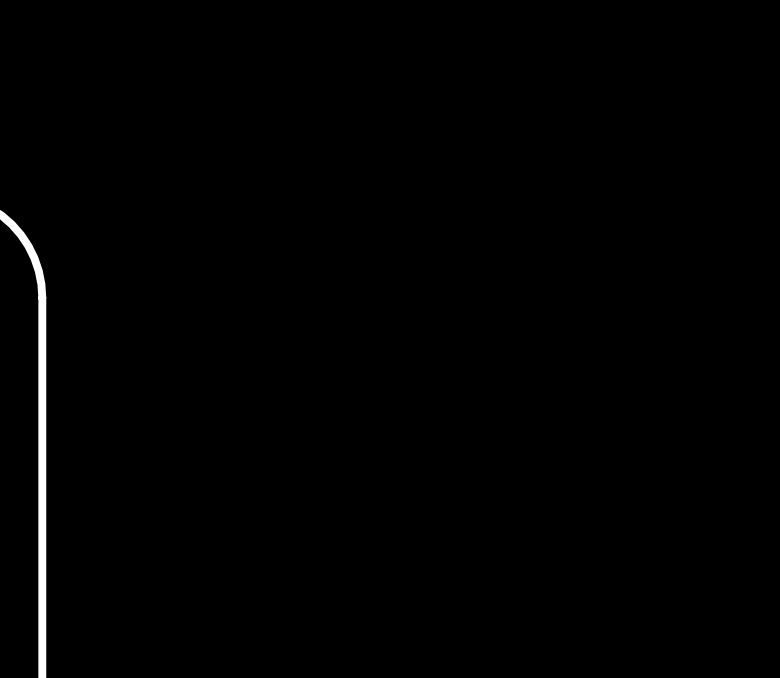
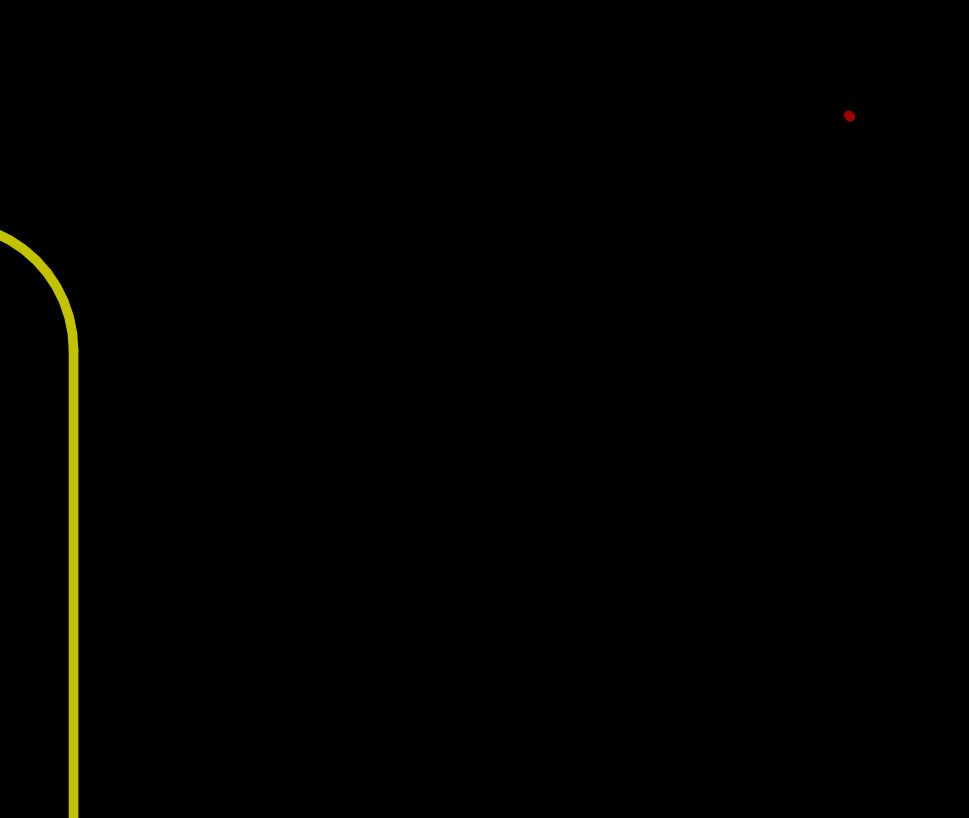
track: none -> (848, 115) (850, 116)

